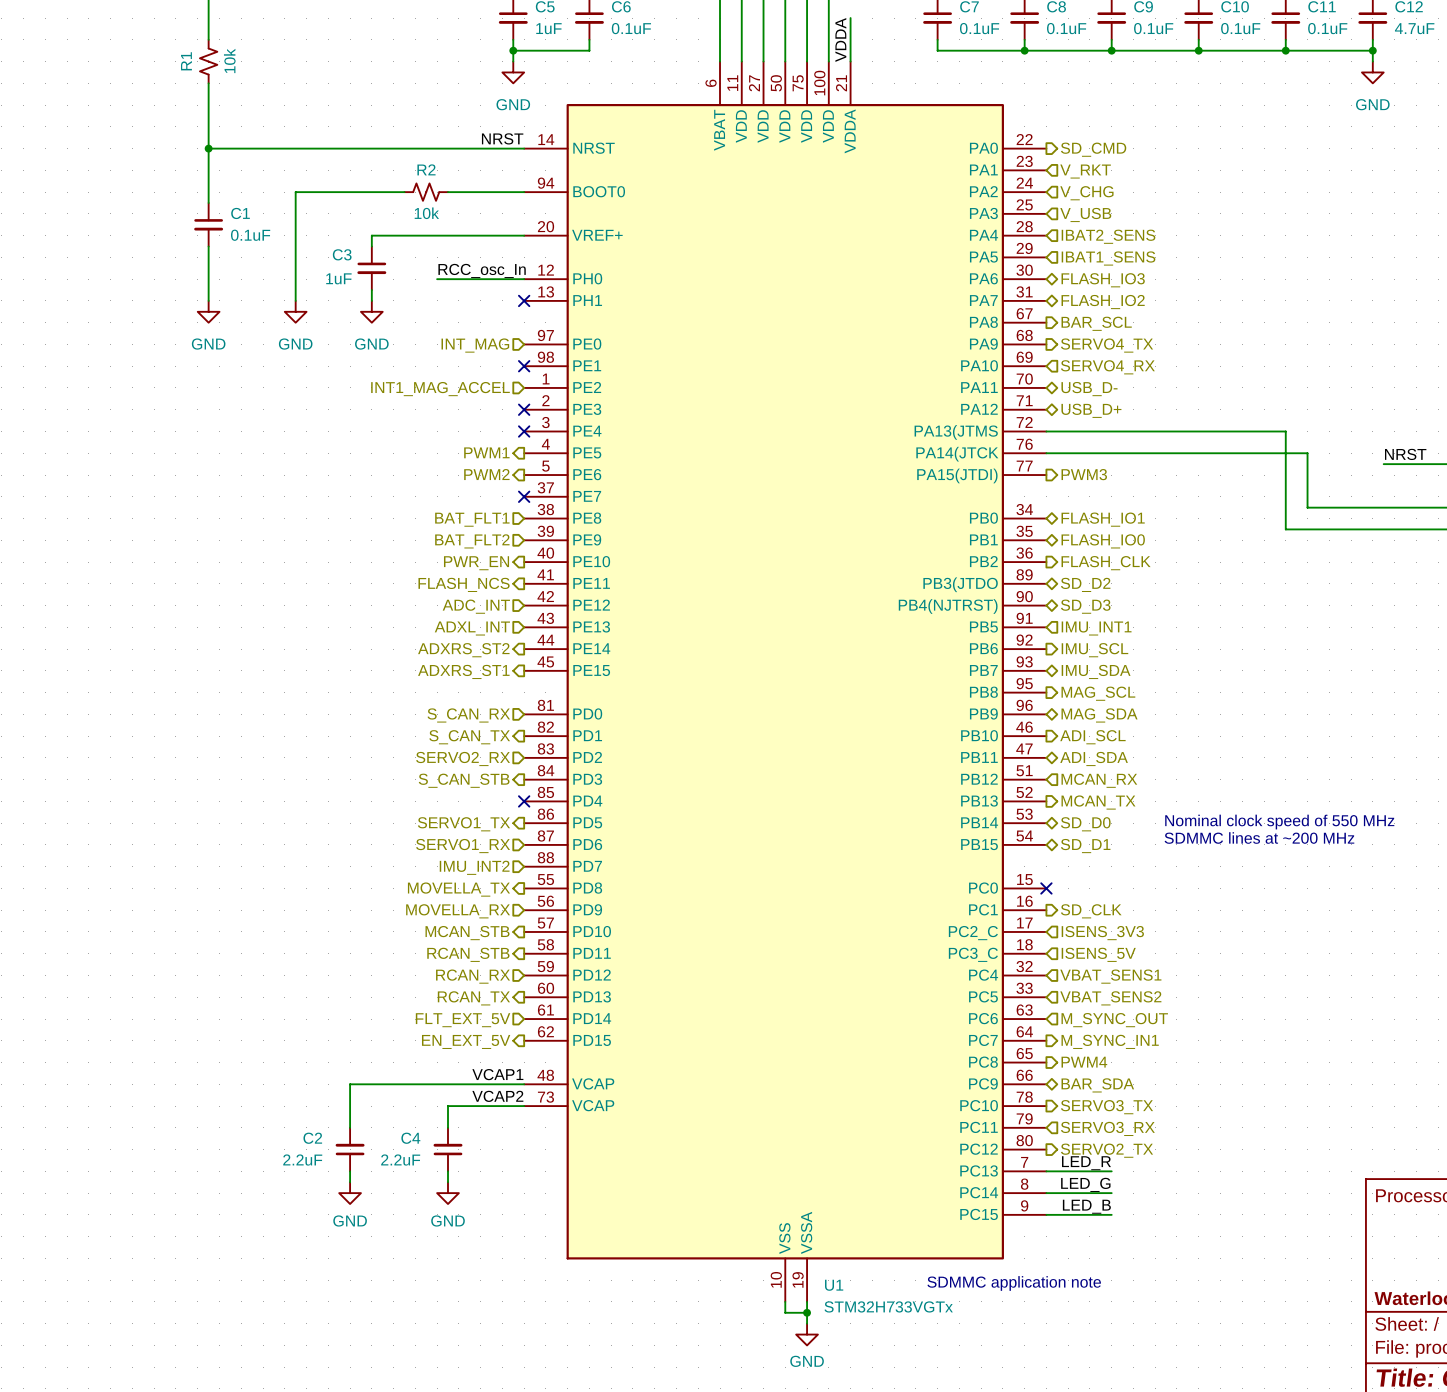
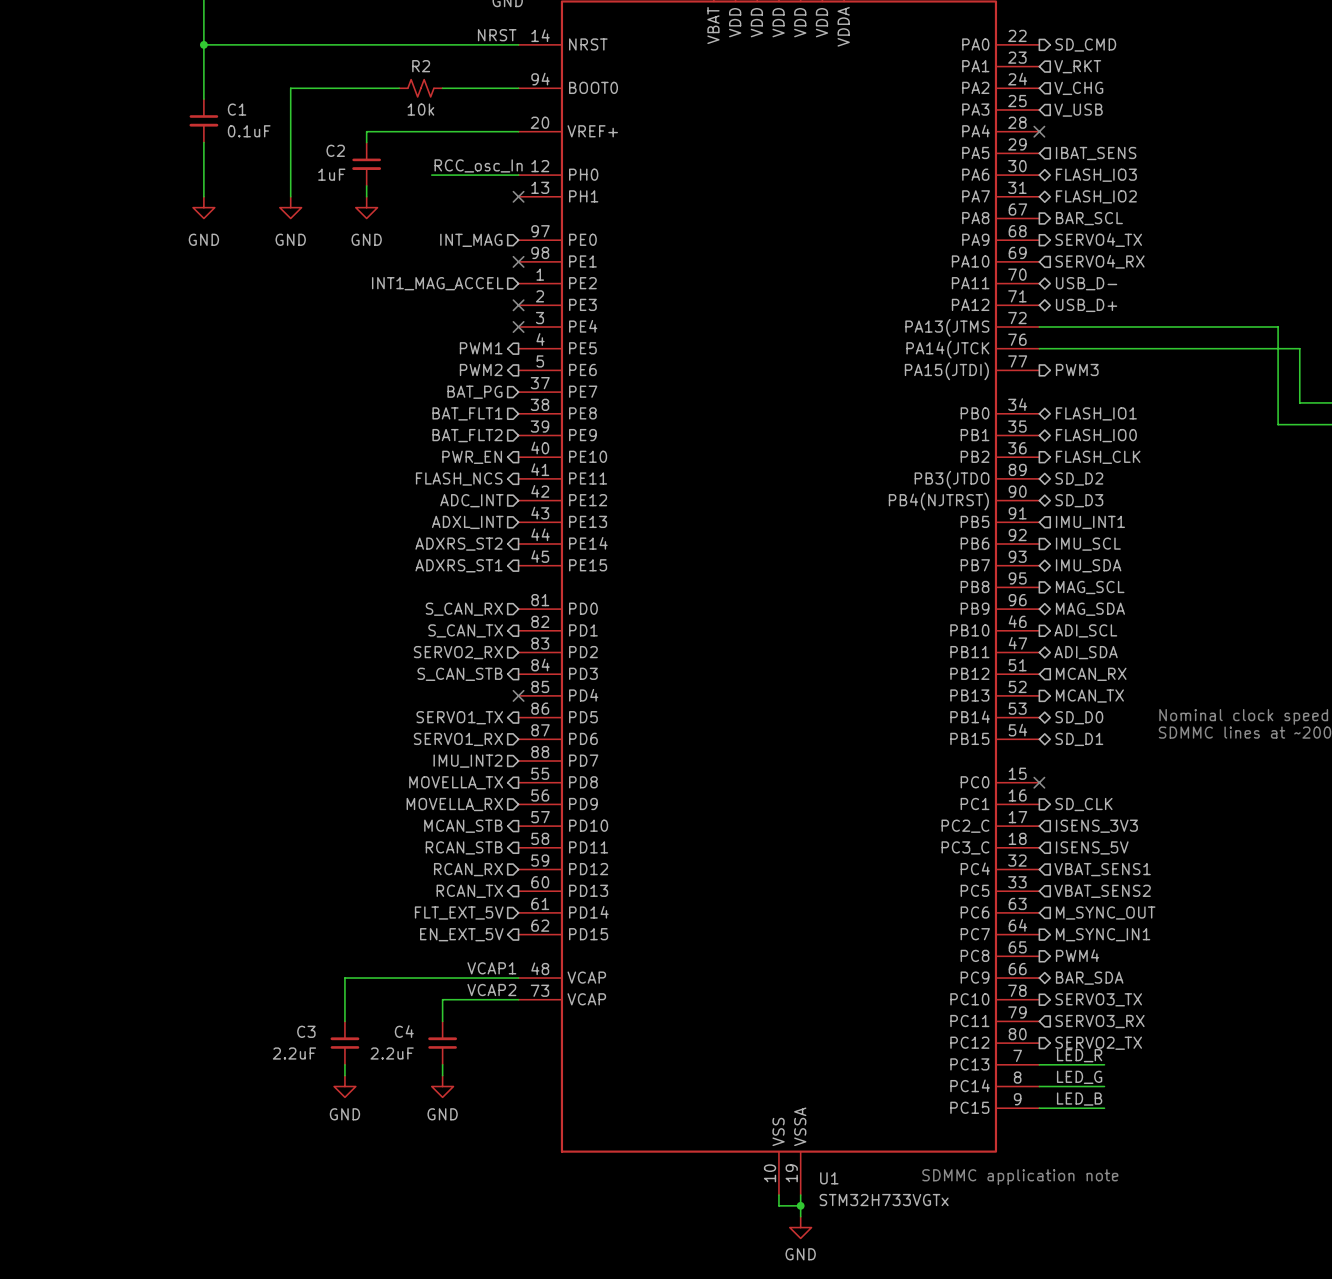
no-connect mark: none -> (1039, 131)
hierarchical label: IBAT2_SENS (1108, 236) -> none
C3 name: C3 (342, 254) -> C2 (335, 150)
hierarchical label: IBAT1_SENS (1108, 258) -> IBAT_SENS (1096, 153)
no-connect mark: (524, 496) -> none
hierarchical label: none -> BAT_PG (474, 392)
C2 name: C2 (312, 1138) -> C3 (306, 1031)

